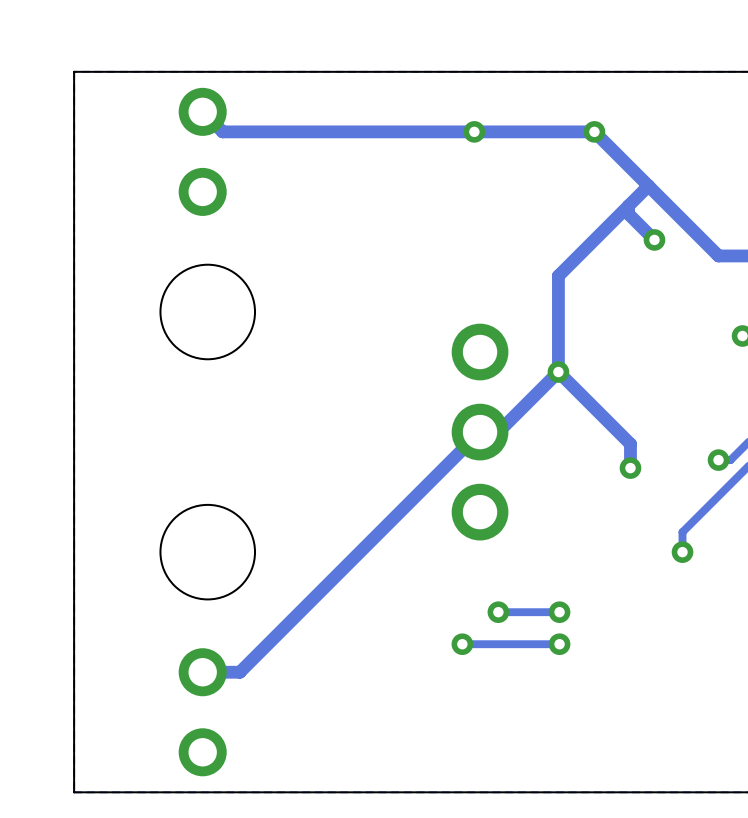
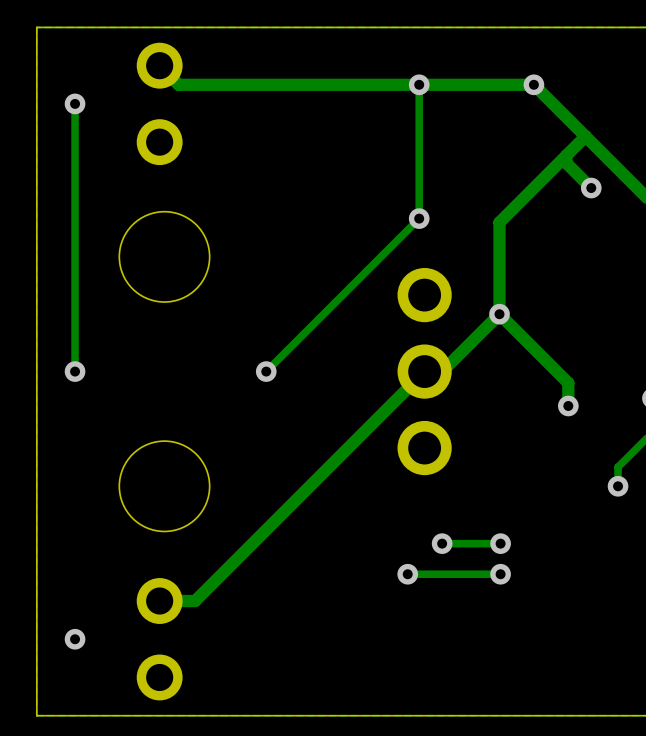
track: none -> (419, 84) (419, 218) (266, 371)
track: none -> (75, 103) (75, 371)
via: none -> (75, 103)
via: none -> (419, 218)
via: none -> (75, 371)
via: none -> (266, 371)
via: none -> (75, 639)

